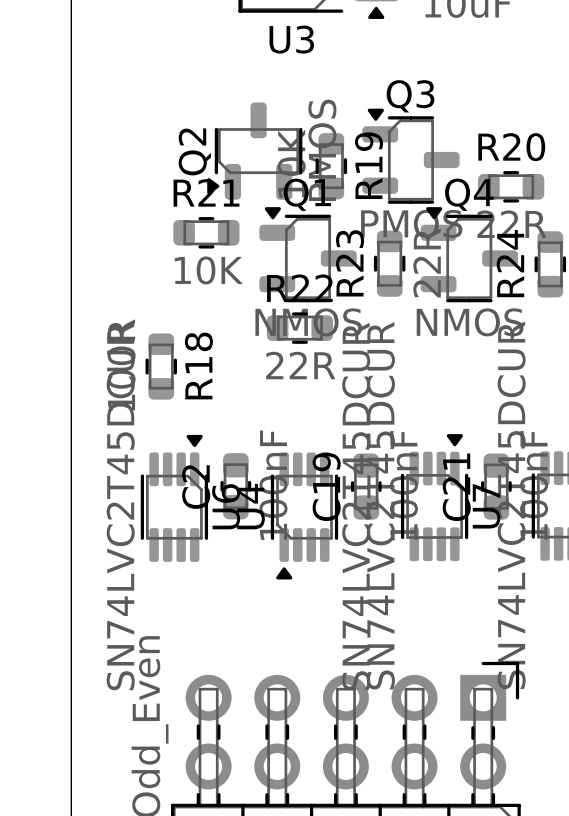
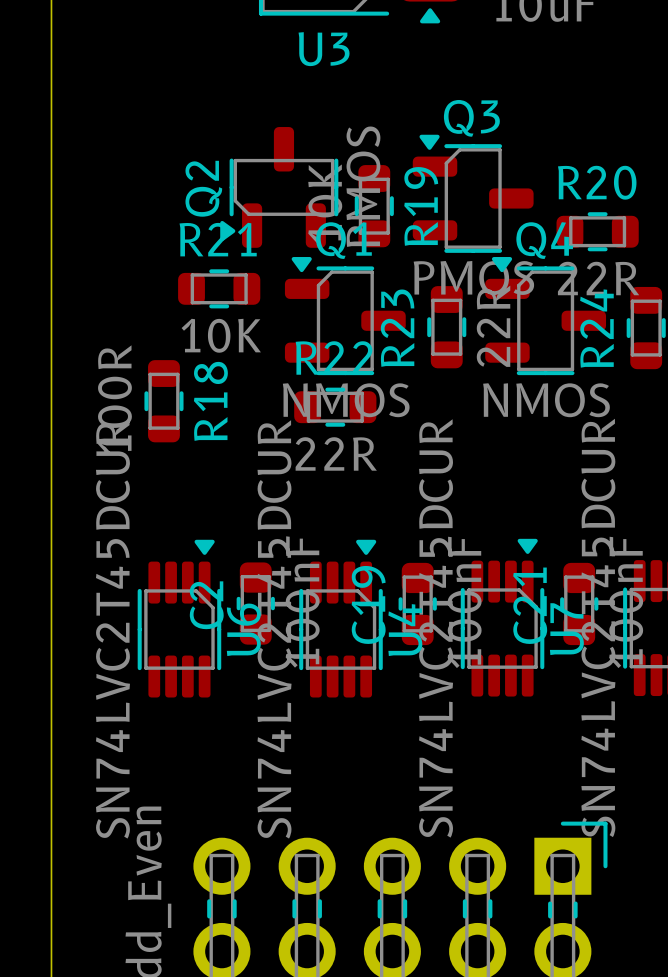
R18 position: (161, 366) -> (163, 401)
U4 rotation: 0° (304, 515) -> 180° (340, 618)

